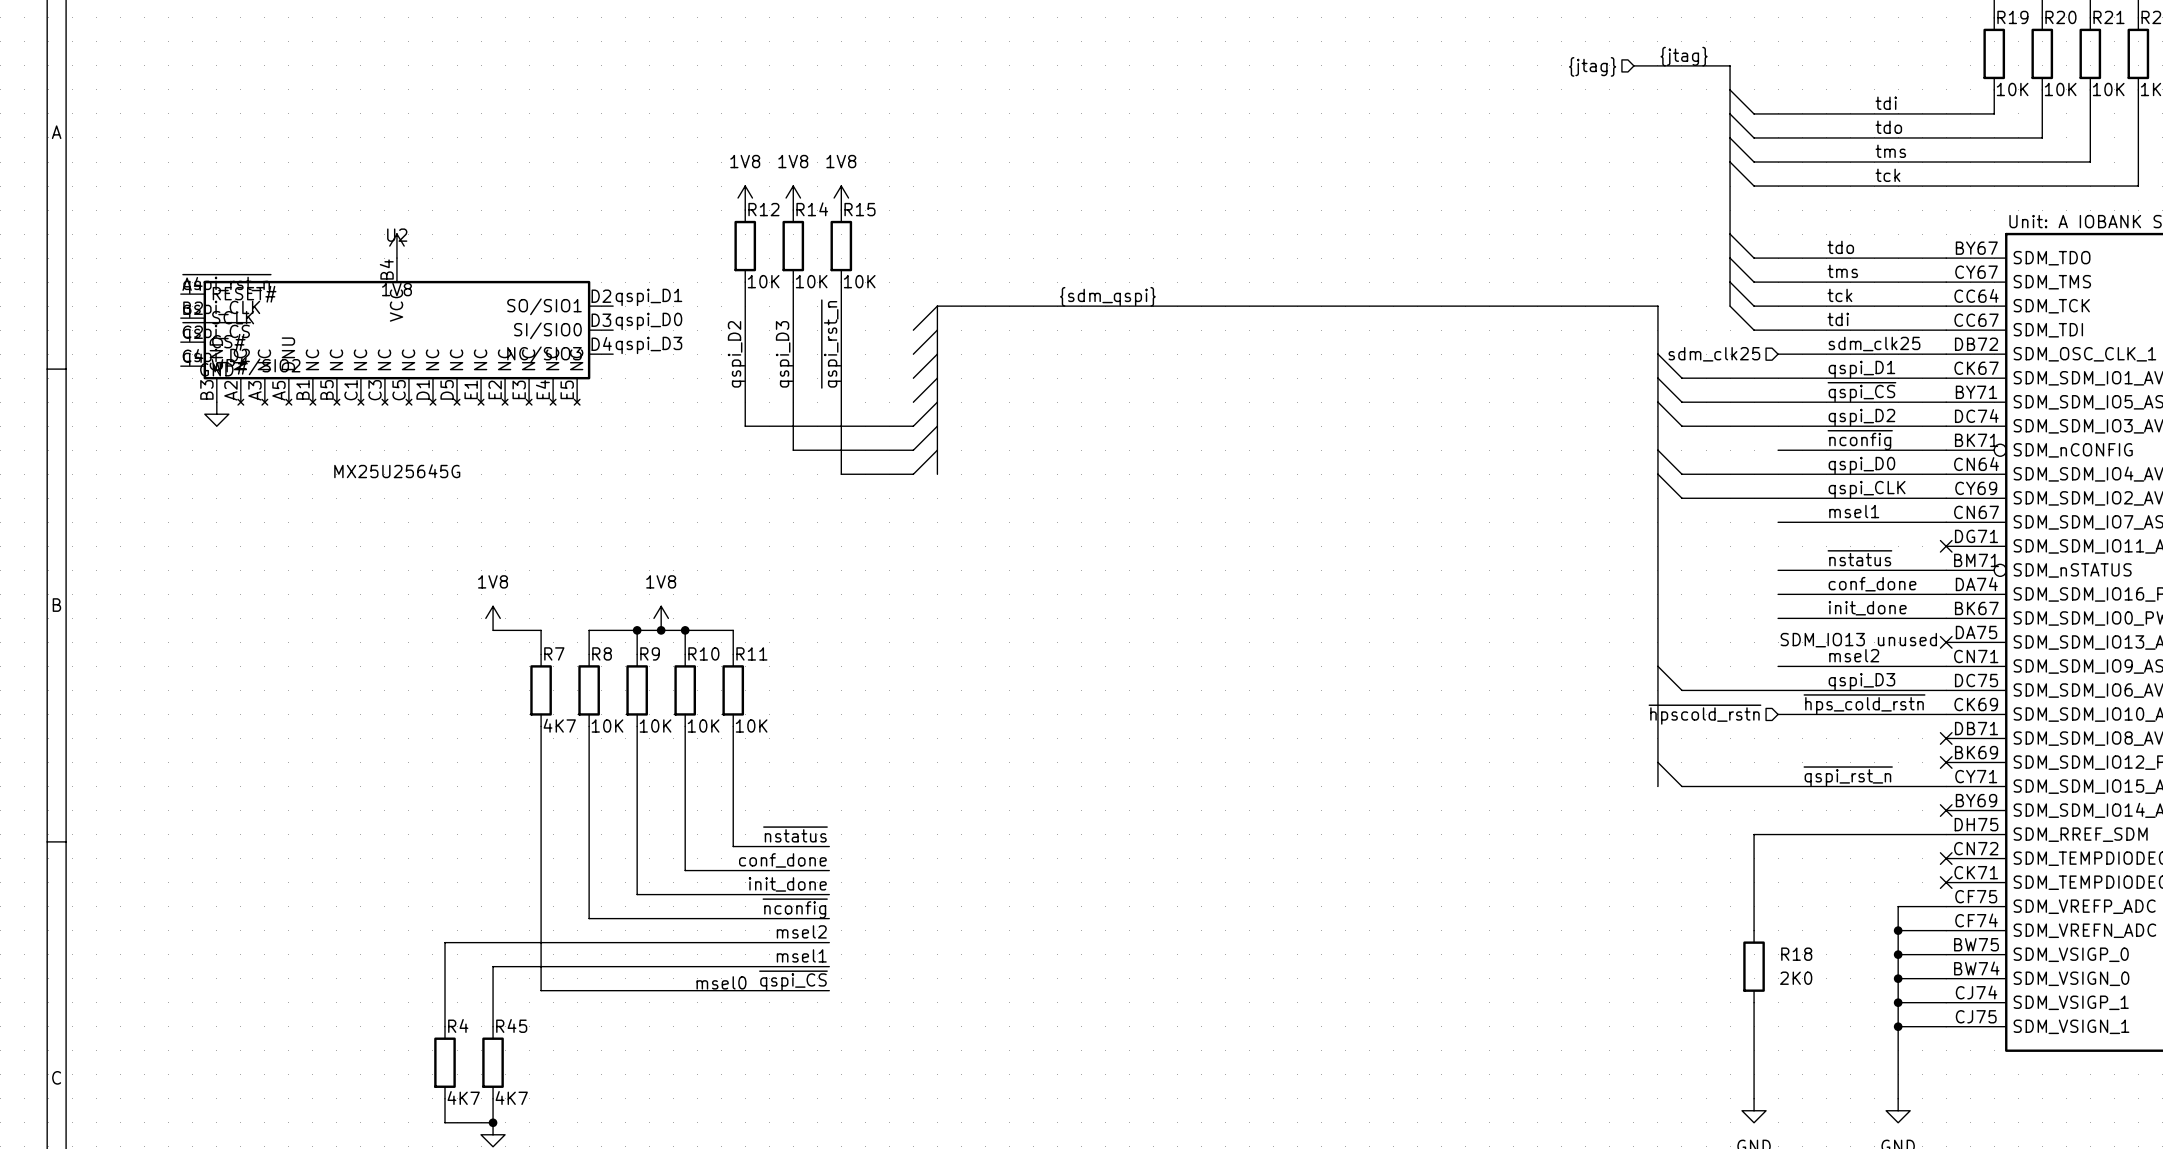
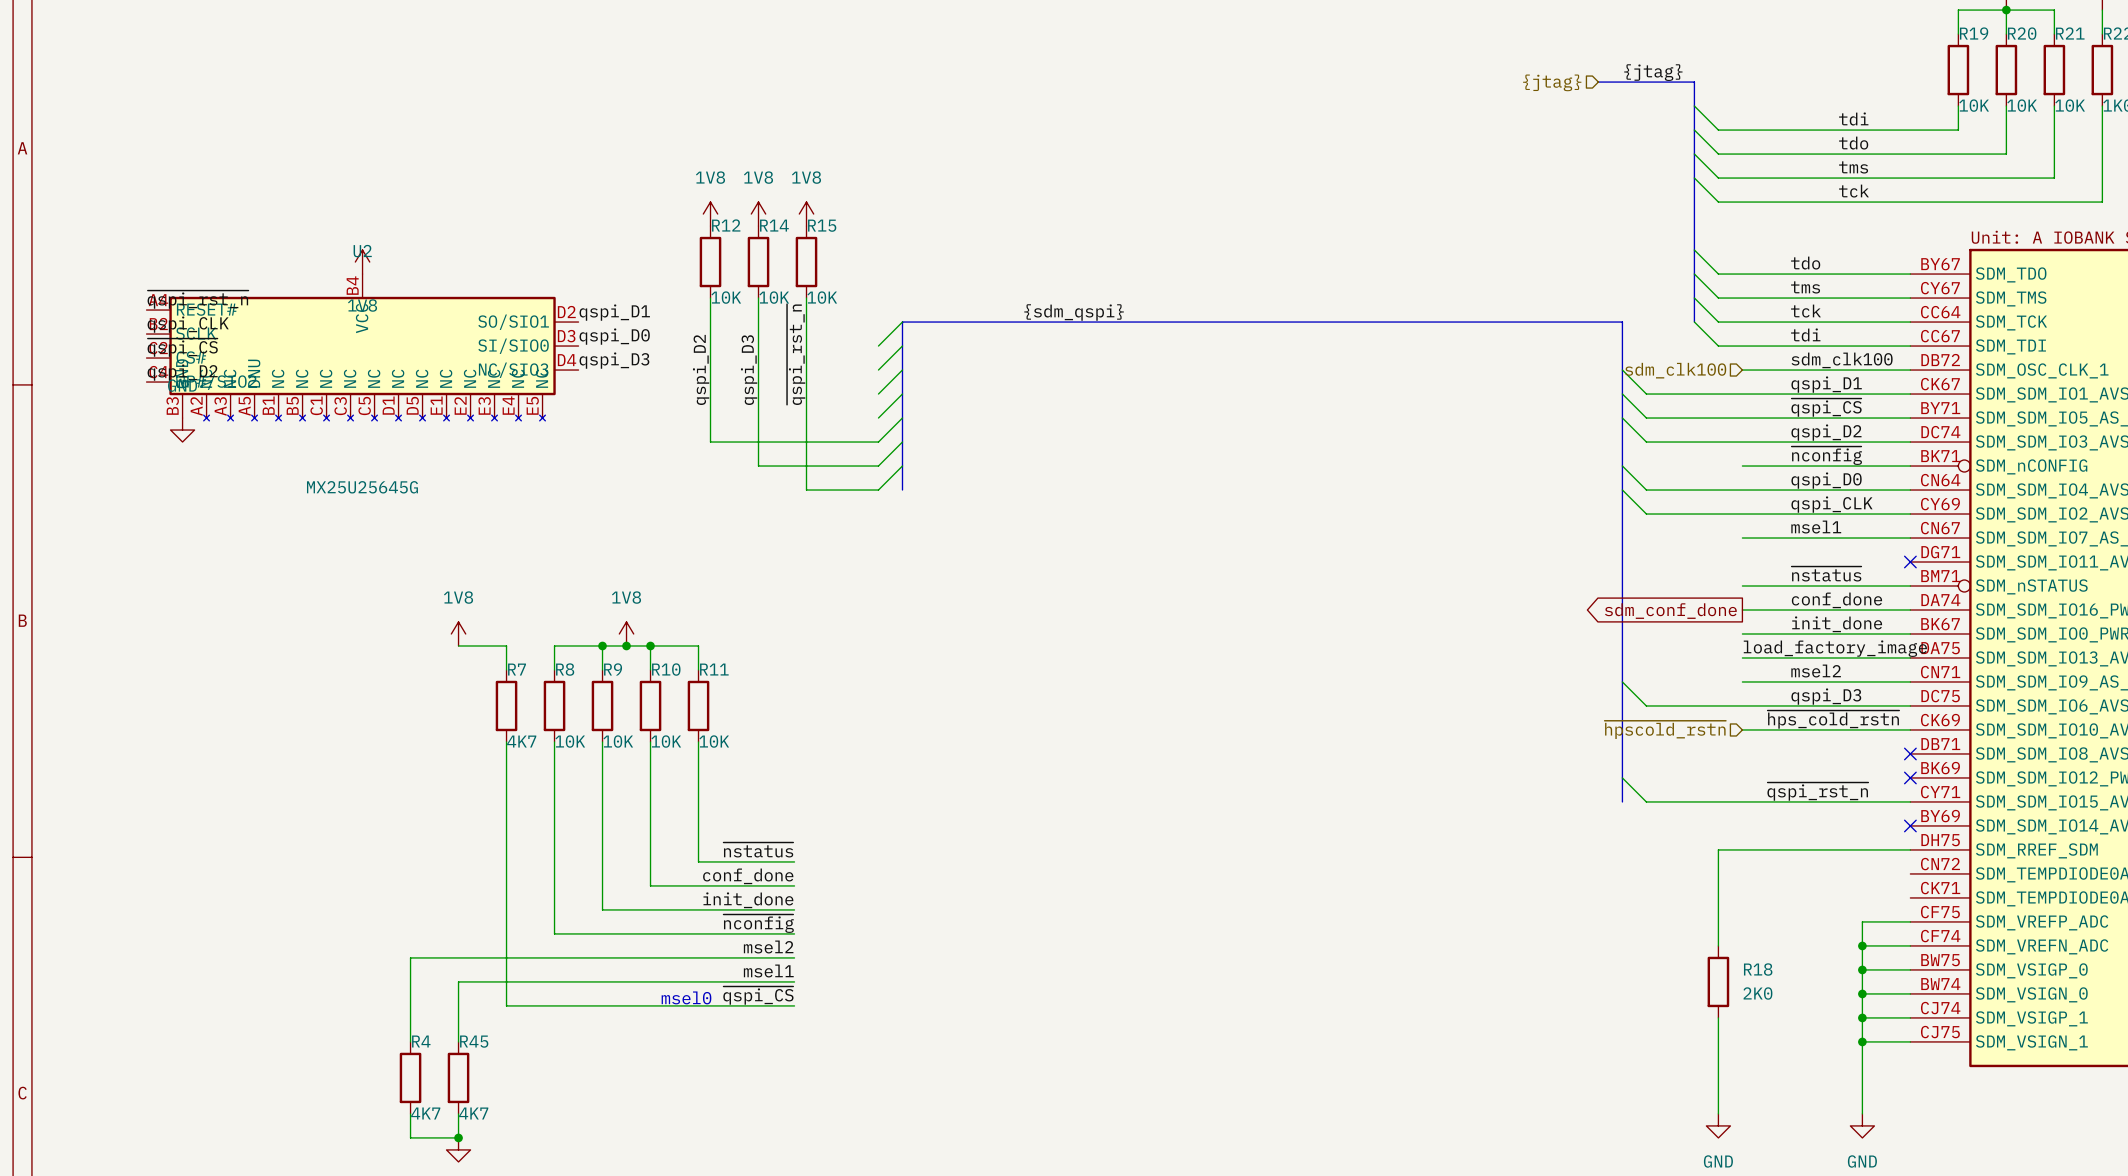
label: sdm_clk25 (1874, 344) -> sdm_clk100 (1842, 360)
hierarchical label: sdm_clk25 (1714, 354) -> sdm_clk100 (1675, 370)
global label: none -> sdm_conf_done (1670, 611)
label: none -> load_factory_image (1835, 648)
text: SDM_IO13 unused (1858, 640) -> none
wire: none -> (1742, 657) (1910, 657)
no-connect mark: (1946, 642) -> none
no-connect mark: (1946, 858) -> none
no-connect mark: (1946, 882) -> none

